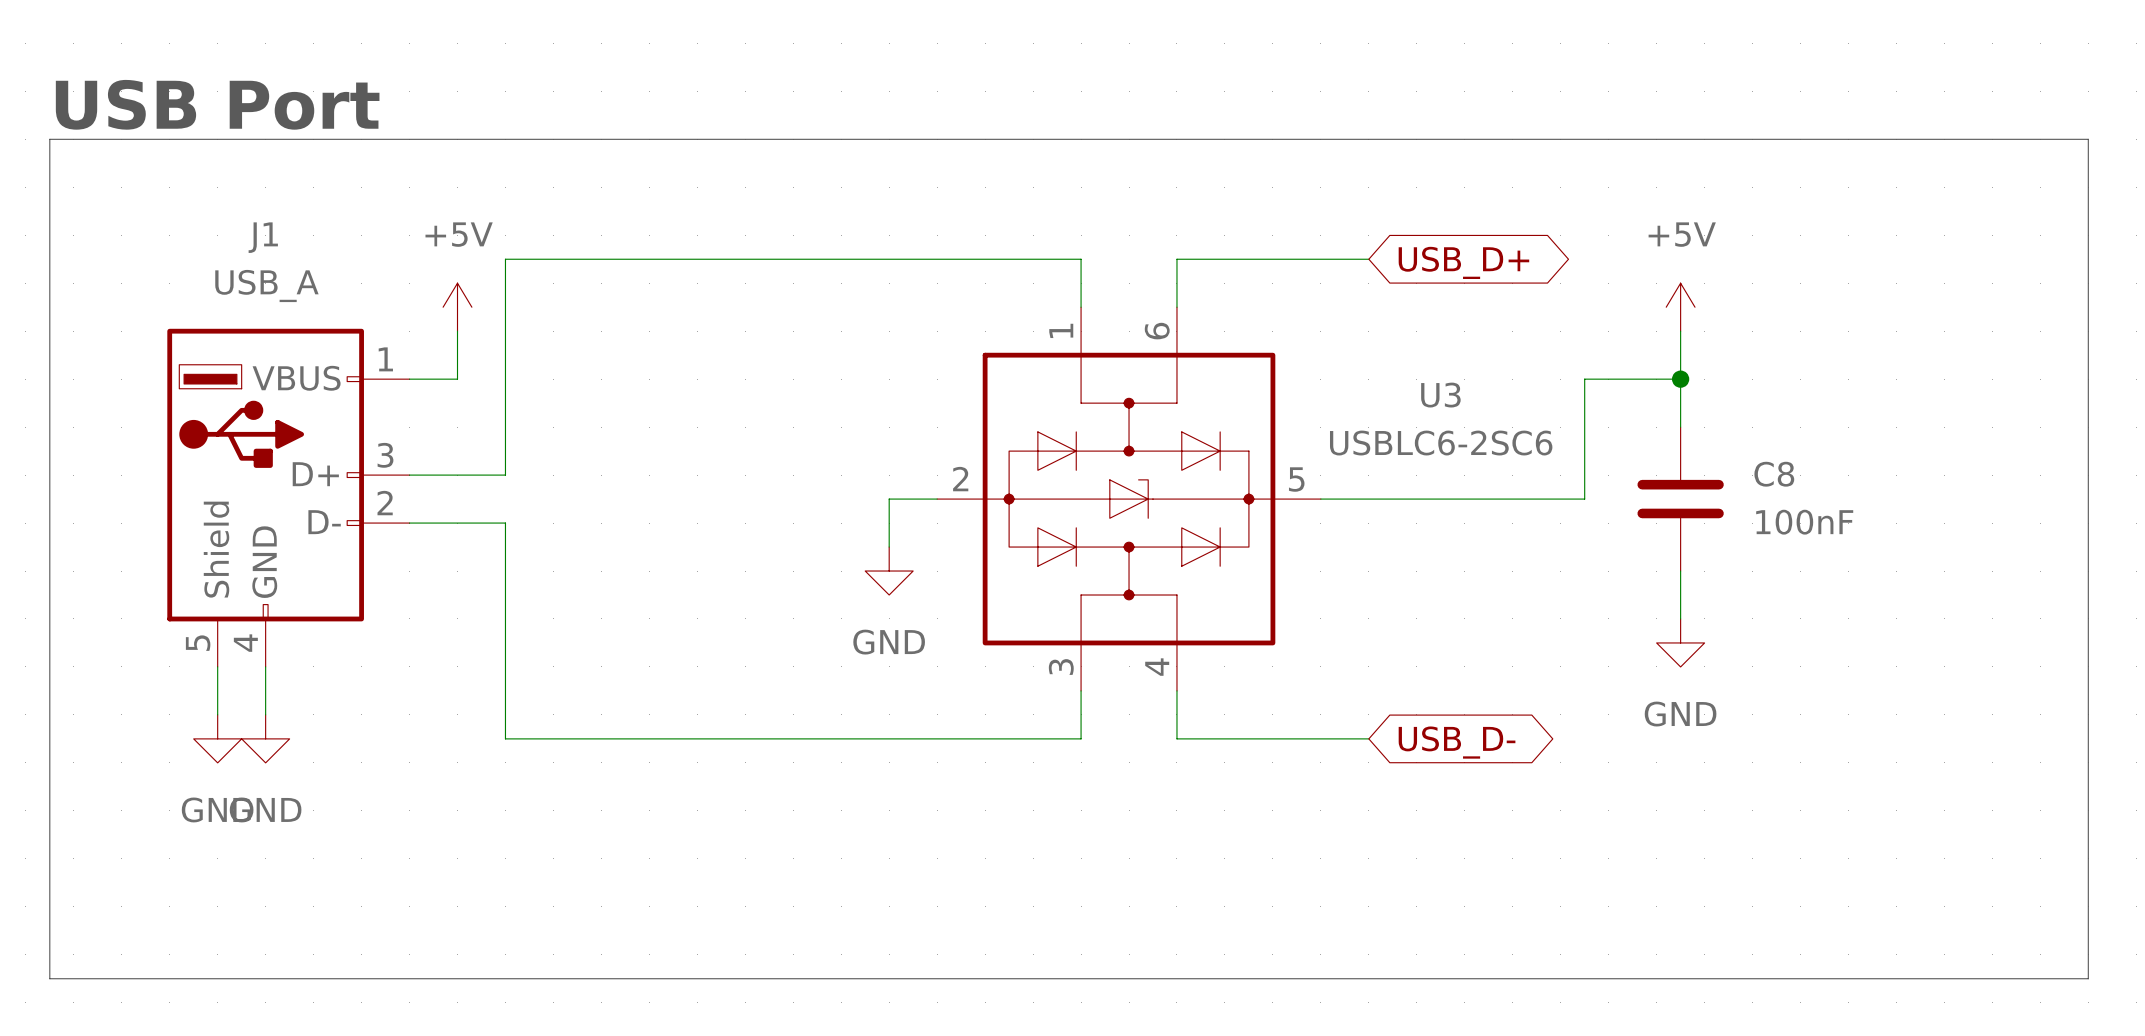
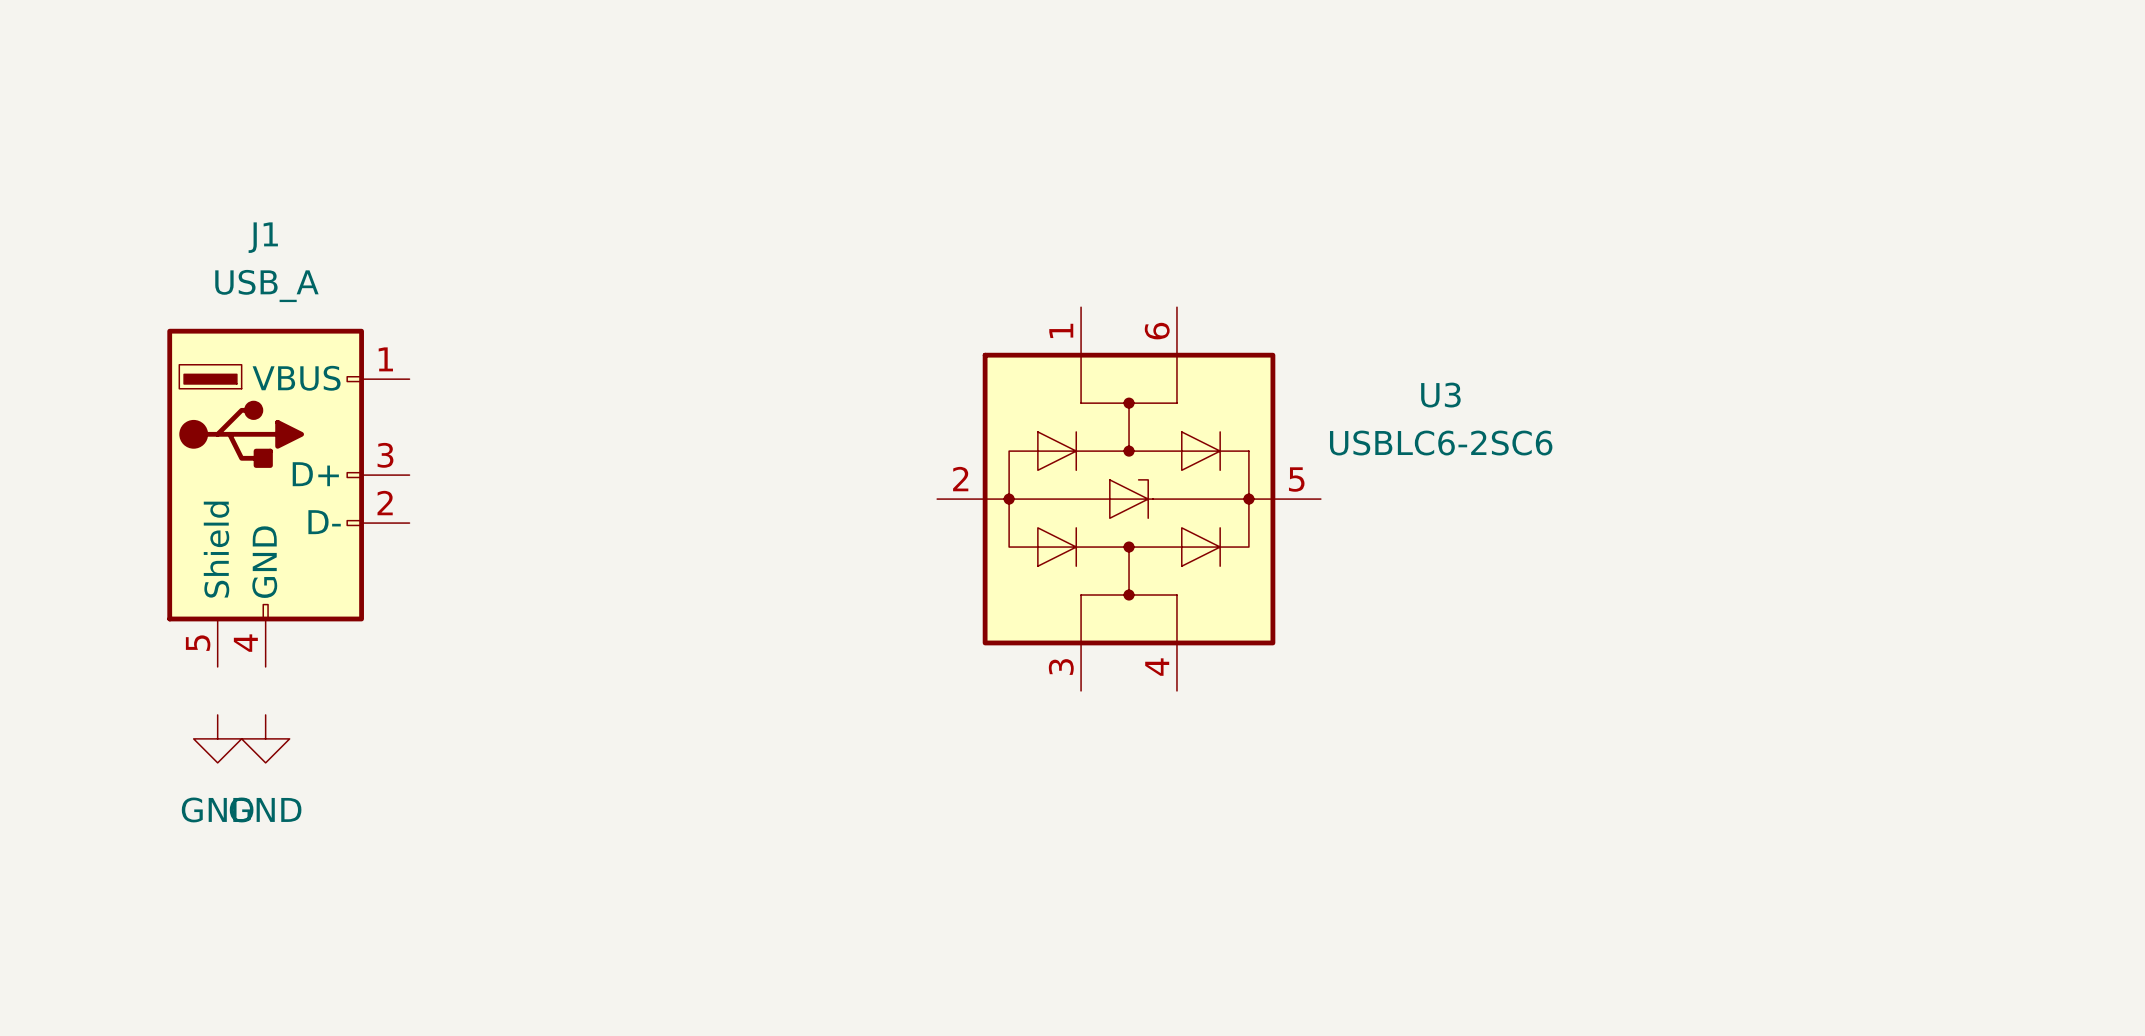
text: USB Port (217, 104) -> none
line: (49, 139) (49, 978) (2088, 978) (2088, 139) (49, 139) -> none
wire: (1368, 259) (1176, 259) (1176, 307) -> none
global label: USB_D+ (1463, 262) -> none
power symbol: +5V (457, 307) -> none
wire: (1081, 307) (1081, 259) (505, 259) (505, 475) (409, 475) -> none
power symbol: +5V (1680, 307) -> none
wire: (457, 331) (457, 379) (409, 379) -> none
wire: (1680, 331) (1680, 427) -> none
wire: (1680, 379) (1584, 379) (1584, 499) (1320, 499) -> none
junction: (1680, 379) -> none
wire: (937, 499) (889, 499) (889, 547) -> none
C8: 100nF (1680, 499) -> none
wire: (409, 523) (505, 523) (505, 738) (1081, 738) (1081, 690) -> none
power symbol: GND (889, 571) -> none
wire: (1680, 571) (1680, 618) -> none
power symbol: GND (1680, 642) -> none
wire: (217, 666) (217, 714) -> none
wire: (265, 666) (265, 714) -> none
wire: (1176, 690) (1176, 738) (1368, 738) -> none
global label: USB_D- (1457, 742) -> none

